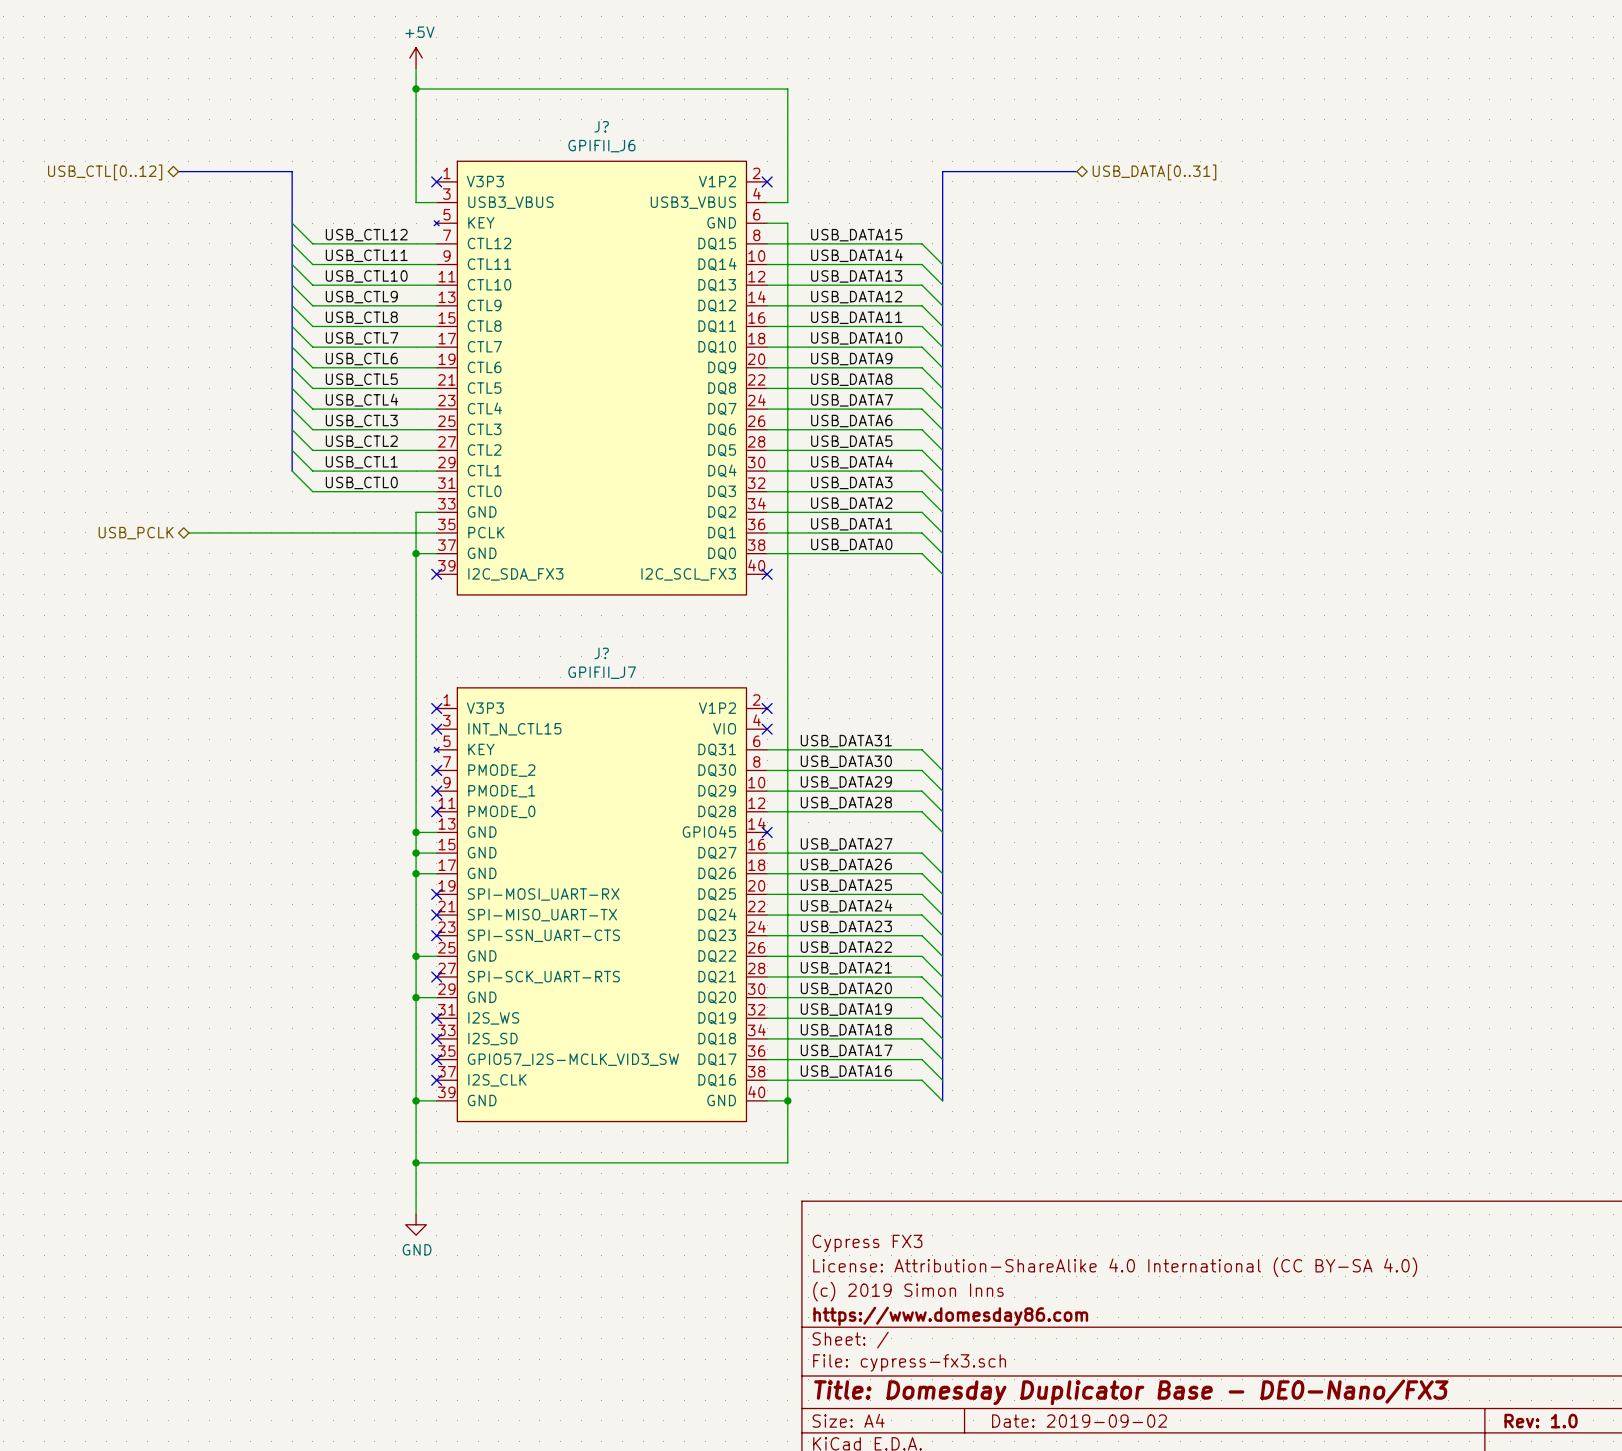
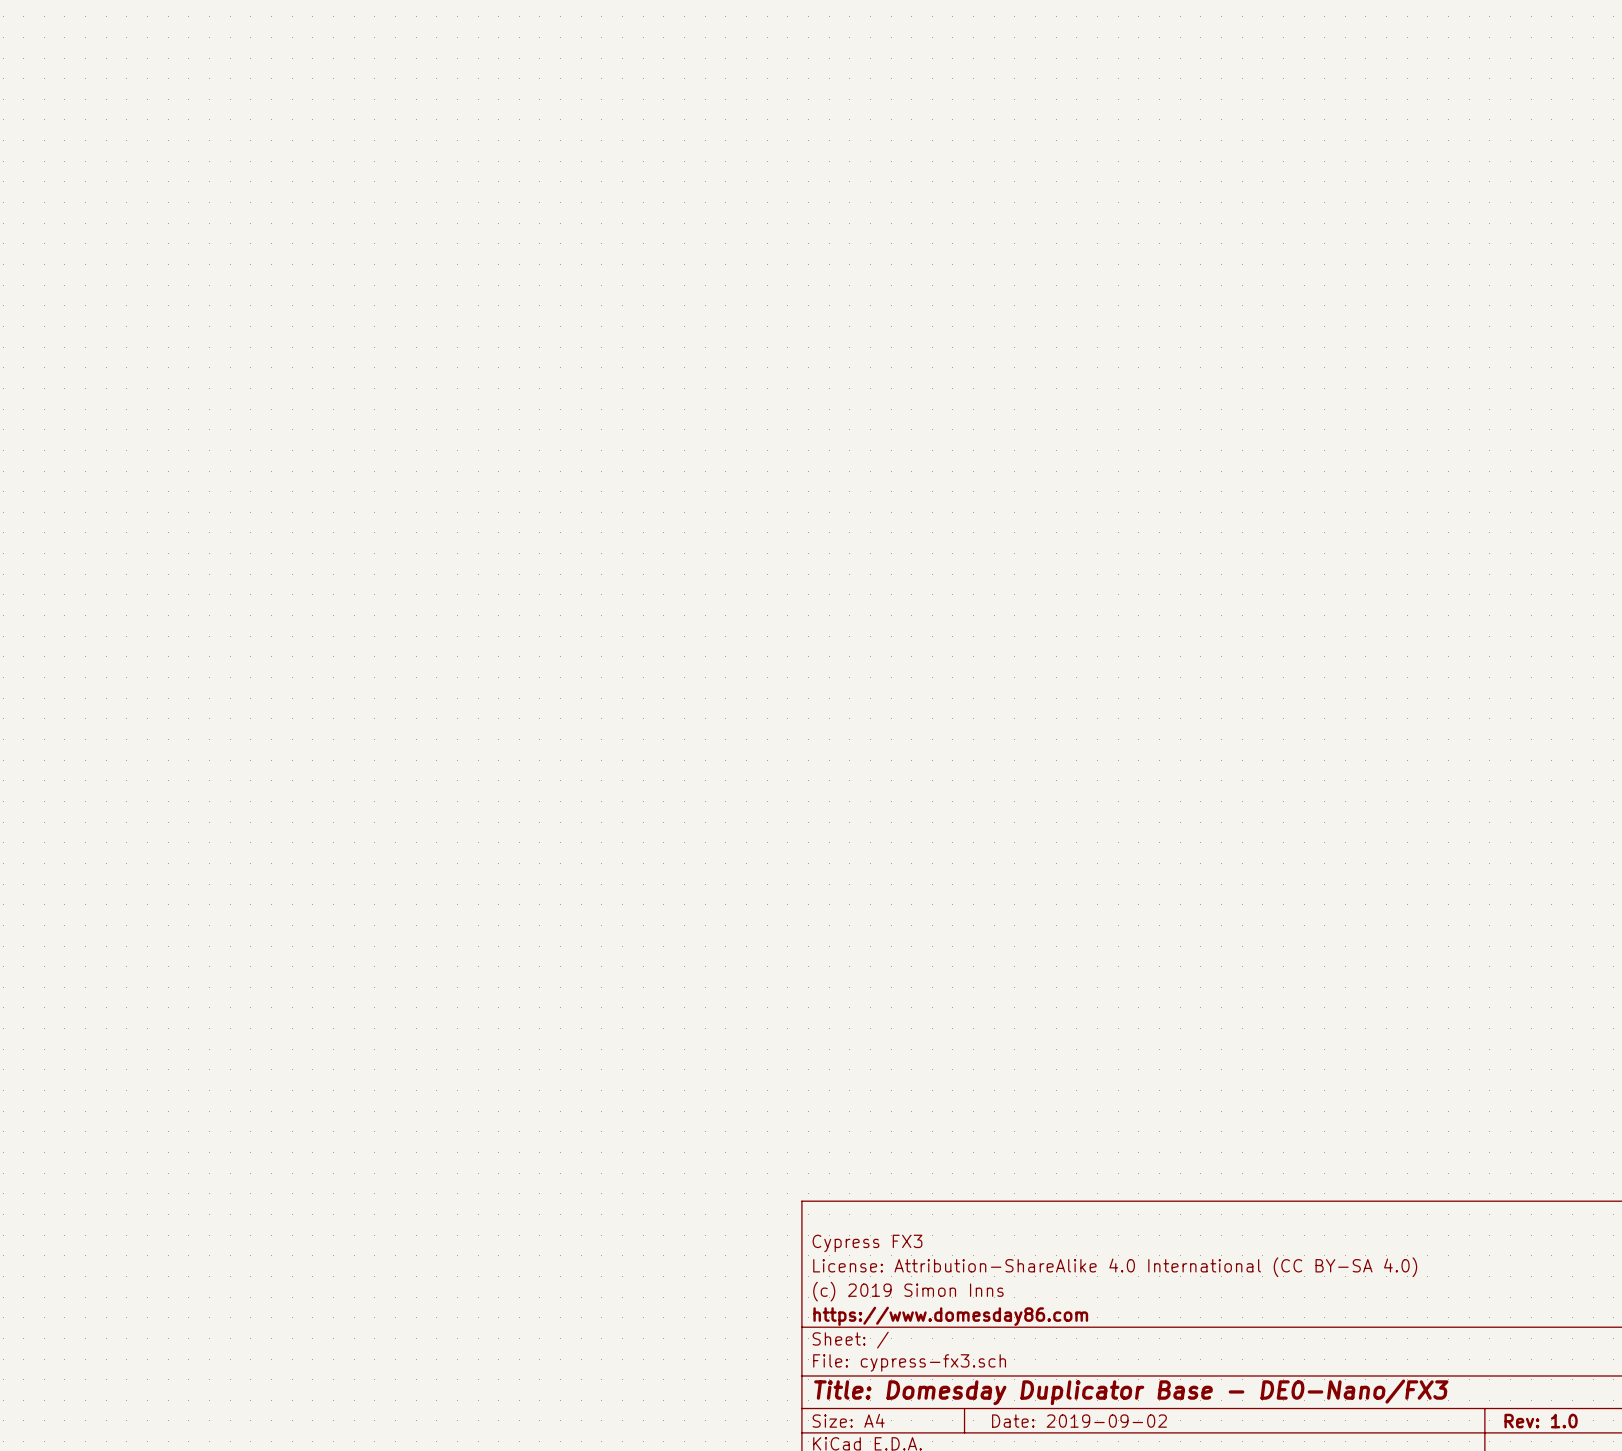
power symbol: +5V (416, 58) -> none
wire: (416, 68) (416, 202) (436, 202) -> none
wire: (416, 88) (787, 88) (787, 202) (767, 202) -> none
junction: (416, 88) -> none
bus: (178, 171) (292, 171) (292, 471) -> none
bus: (1076, 171) (942, 171) (942, 1100) -> none
hierarchical label: USB_CTL[0..12] (105, 172) -> none
hierarchical label: USB_DATA[0..31] (1154, 172) -> none
no-connect mark: (436, 181) -> none
no-connect mark: (767, 181) -> none
wire: (292, 223) (312, 243) (436, 243) -> none
wire: (767, 223) (787, 223) (787, 1162) (416, 1162) -> none
label: USB_CTL12 (366, 235) -> none
label: USB_DATA15 (856, 235) -> none
wire: (292, 243) (312, 264) (436, 264) -> none
wire: (767, 243) (922, 243) (942, 264) -> none
label: USB_CTL11 (366, 255) -> none
label: USB_DATA14 (856, 255) -> none
wire: (292, 264) (312, 285) (436, 285) -> none
wire: (767, 264) (922, 264) (942, 285) -> none
label: USB_CTL10 (366, 276) -> none
label: USB_DATA13 (856, 276) -> none
wire: (292, 285) (312, 305) (436, 305) -> none
wire: (767, 285) (922, 285) (942, 305) -> none
label: USB_CTL9 (361, 297) -> none
label: USB_DATA12 (856, 297) -> none
wire: (292, 305) (312, 326) (436, 326) -> none
wire: (767, 305) (922, 305) (942, 326) -> none
label: USB_CTL8 (361, 317) -> none
label: USB_DATA11 (856, 317) -> none
wire: (292, 326) (312, 347) (436, 347) -> none
wire: (767, 326) (922, 326) (942, 347) -> none
label: USB_CTL7 (362, 338) -> none
label: USB_DATA10 (856, 338) -> none
wire: (292, 347) (312, 367) (436, 367) -> none
wire: (767, 347) (922, 347) (942, 367) -> none
label: USB_CTL6 (361, 359) -> none
label: USB_DATA9 (851, 359) -> none
wire: (292, 367) (312, 388) (436, 388) -> none
wire: (767, 367) (922, 367) (942, 388) -> none
J?: GPIFII_J6 (600, 378) -> none
label: USB_CTL5 (361, 379) -> none
label: USB_DATA8 (851, 379) -> none
wire: (292, 388) (312, 409) (436, 409) -> none
wire: (767, 388) (922, 388) (942, 409) -> none
label: USB_CTL4 (362, 400) -> none
label: USB_DATA7 (852, 400) -> none
wire: (292, 409) (312, 429) (436, 429) -> none
wire: (767, 409) (922, 409) (942, 429) -> none
label: USB_CTL3 (361, 421) -> none
label: USB_DATA6 (851, 421) -> none
wire: (292, 429) (312, 450) (436, 450) -> none
wire: (767, 429) (922, 429) (942, 450) -> none
label: USB_CTL2 (361, 441) -> none
label: USB_DATA5 (851, 441) -> none
wire: (292, 450) (312, 471) (436, 471) -> none
wire: (767, 450) (922, 450) (942, 471) -> none
label: USB_CTL1 (361, 462) -> none
label: USB_DATA4 (852, 462) -> none
wire: (292, 471) (312, 491) (436, 491) -> none
wire: (767, 471) (922, 471) (942, 491) -> none
label: USB_CTL0 (361, 482) -> none
label: USB_DATA3 (851, 482) -> none
wire: (767, 491) (922, 491) (942, 512) -> none
label: USB_DATA2 (851, 503) -> none
wire: (436, 512) (416, 512) (416, 1214) -> none
wire: (767, 512) (922, 512) (942, 532) -> none
label: USB_DATA1 (851, 524) -> none
wire: (188, 532) (436, 532) -> none
wire: (767, 532) (922, 532) (942, 553) -> none
hierarchical label: USB_PCLK (136, 533) -> none
label: USB_DATA0 (851, 544) -> none
wire: (416, 553) (436, 553) -> none
junction: (416, 553) -> none
wire: (767, 553) (922, 553) (942, 574) -> none
no-connect mark: (436, 574) -> none
no-connect mark: (767, 574) -> none
no-connect mark: (436, 708) -> none
no-connect mark: (767, 708) -> none
no-connect mark: (436, 729) -> none
no-connect mark: (767, 729) -> none
label: USB_DATA31 (846, 741) -> none
wire: (767, 749) (922, 749) (942, 770) -> none
label: USB_DATA30 (846, 761) -> none
no-connect mark: (436, 770) -> none
wire: (767, 770) (922, 770) (942, 791) -> none
label: USB_DATA29 (846, 782) -> none
no-connect mark: (436, 791) -> none
wire: (767, 791) (922, 791) (942, 811) -> none
label: USB_DATA28 (846, 803) -> none
no-connect mark: (436, 811) -> none
wire: (767, 811) (922, 811) (942, 832) -> none
wire: (416, 832) (436, 832) -> none
junction: (416, 832) -> none
no-connect mark: (767, 832) -> none
label: USB_DATA27 (846, 844) -> none
wire: (416, 853) (436, 853) -> none
junction: (416, 853) -> none
wire: (767, 853) (922, 853) (942, 873) -> none
label: USB_DATA26 (846, 865) -> none
wire: (416, 873) (436, 873) -> none
junction: (416, 873) -> none
wire: (767, 873) (922, 873) (942, 894) -> none
label: USB_DATA25 (846, 885) -> none
no-connect mark: (436, 894) -> none
wire: (767, 894) (922, 894) (942, 915) -> none
J?: GPIFII_J7 (600, 904) -> none
label: USB_DATA24 (846, 906) -> none
no-connect mark: (436, 915) -> none
wire: (767, 915) (922, 915) (942, 935) -> none
label: USB_DATA23 (846, 926) -> none
no-connect mark: (436, 935) -> none
wire: (767, 935) (922, 935) (942, 956) -> none
label: USB_DATA22 (846, 947) -> none
wire: (416, 956) (436, 956) -> none
junction: (416, 956) -> none
wire: (767, 956) (922, 956) (942, 976) -> none
label: USB_DATA21 (846, 968) -> none
no-connect mark: (436, 976) -> none
wire: (767, 976) (922, 976) (942, 997) -> none
label: USB_DATA20 (846, 988) -> none
wire: (416, 997) (436, 997) -> none
junction: (416, 997) -> none
wire: (767, 997) (922, 997) (942, 1018) -> none
label: USB_DATA19 (846, 1009) -> none
no-connect mark: (436, 1018) -> none
wire: (767, 1018) (922, 1018) (942, 1038) -> none
label: USB_DATA18 (846, 1030) -> none
no-connect mark: (436, 1038) -> none
wire: (767, 1038) (922, 1038) (942, 1059) -> none
label: USB_DATA17 (846, 1050) -> none
no-connect mark: (436, 1059) -> none
wire: (767, 1059) (922, 1059) (942, 1080) -> none
label: USB_DATA16 (846, 1071) -> none
no-connect mark: (436, 1080) -> none
wire: (767, 1080) (922, 1080) (942, 1100) -> none
wire: (416, 1100) (436, 1100) -> none
junction: (416, 1100) -> none
wire: (767, 1100) (787, 1100) -> none
junction: (787, 1100) -> none
junction: (416, 1162) -> none
power symbol: GND (416, 1224) -> none

